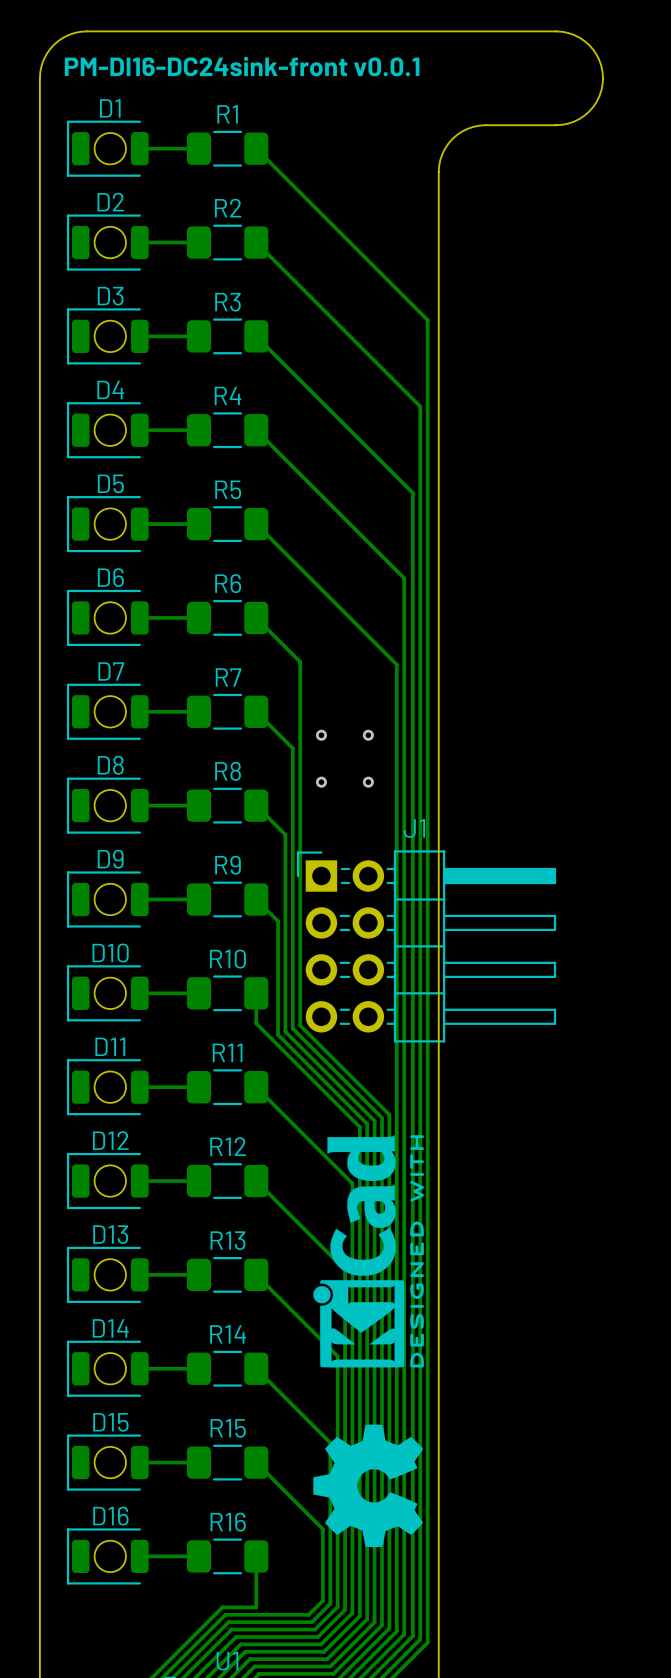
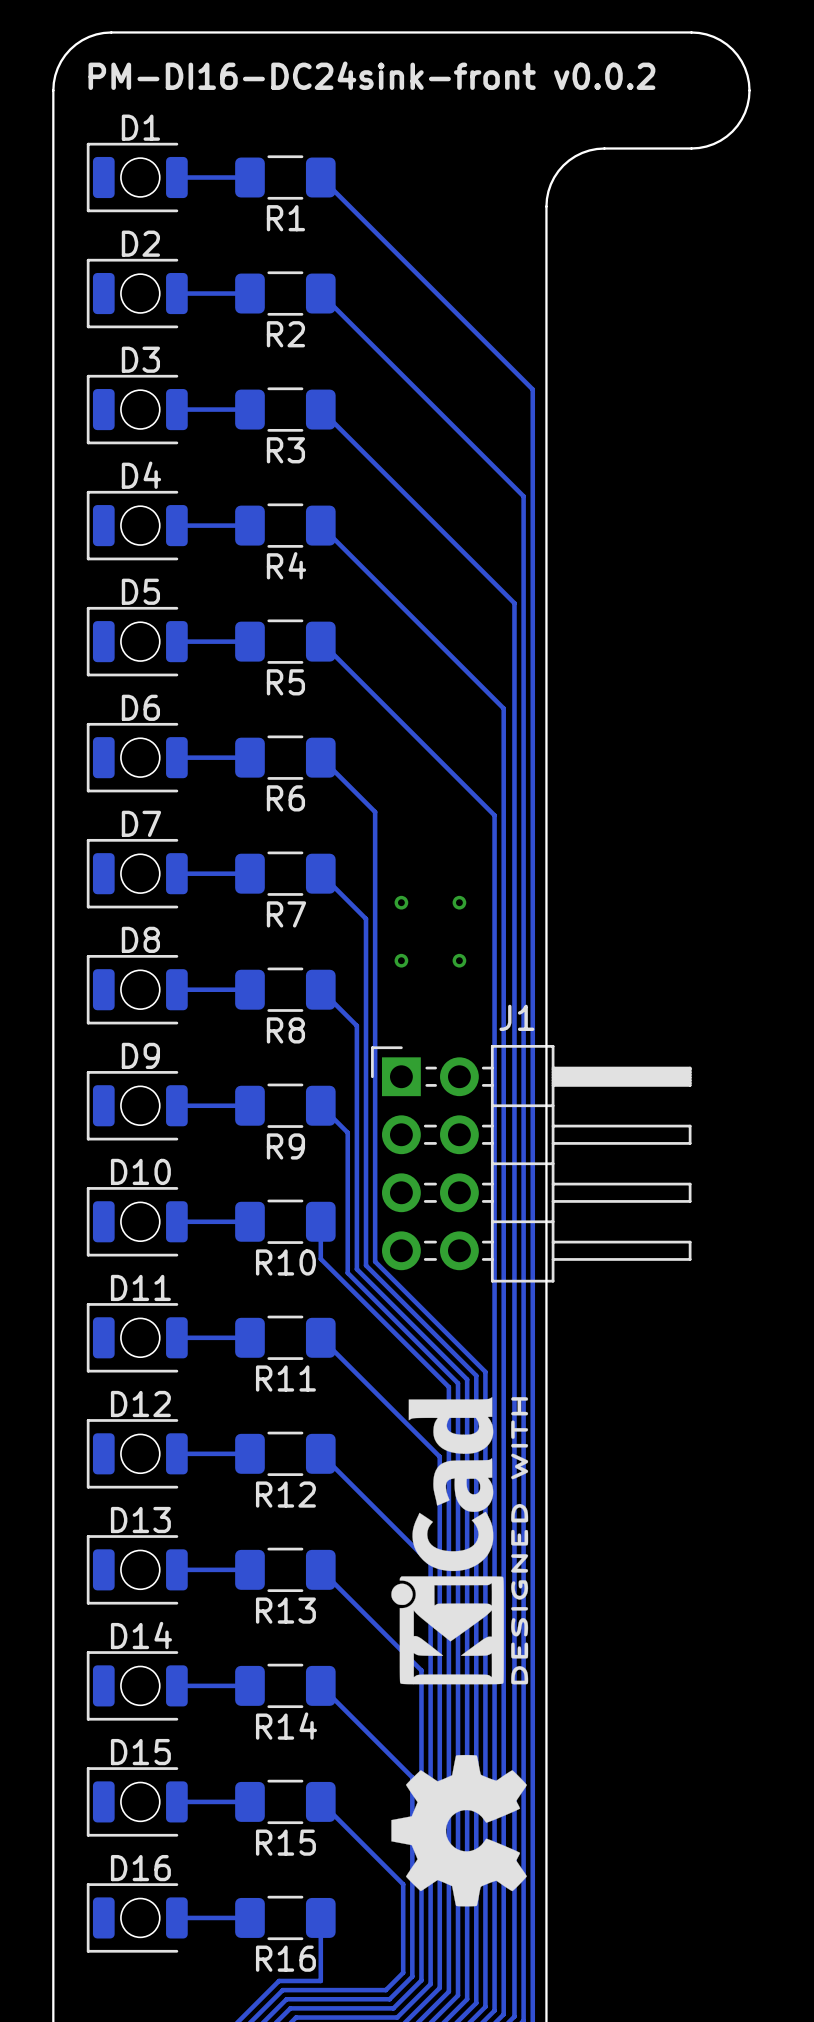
text: PM-DI16-DC24sink-front v0.0.1 (242, 66) -> PM-DI16-DC24sink-front v0.0.2 (371, 75)
R1 name position: R1 (227, 114) -> R1 (285, 218)
R2 name position: R2 (228, 208) -> R2 (285, 334)
R3 name position: R3 (227, 302) -> R3 (285, 450)
R4 name position: R4 (228, 395) -> R4 (286, 565)
R5 name position: R5 (228, 489) -> R5 (285, 682)
R6 name position: R6 (228, 583) -> R6 (285, 798)
R7 name position: R7 (228, 677) -> R7 (286, 914)
R8 name position: R8 (228, 771) -> R8 (285, 1030)
R9 name position: R9 (227, 865) -> R9 (285, 1146)
R10 name position: R10 (227, 959) -> R10 (285, 1262)
R11 name position: R11 (227, 1052) -> R11 (285, 1378)
R12 name position: R12 (228, 1146) -> R12 (285, 1494)
R13 name position: R13 (227, 1240) -> R13 (285, 1610)
R14 name position: R14 (228, 1334) -> R14 (286, 1726)
R15 name position: R15 (228, 1428) -> R15 (285, 1842)
R16 name position: R16 (228, 1522) -> R16 (285, 1958)

